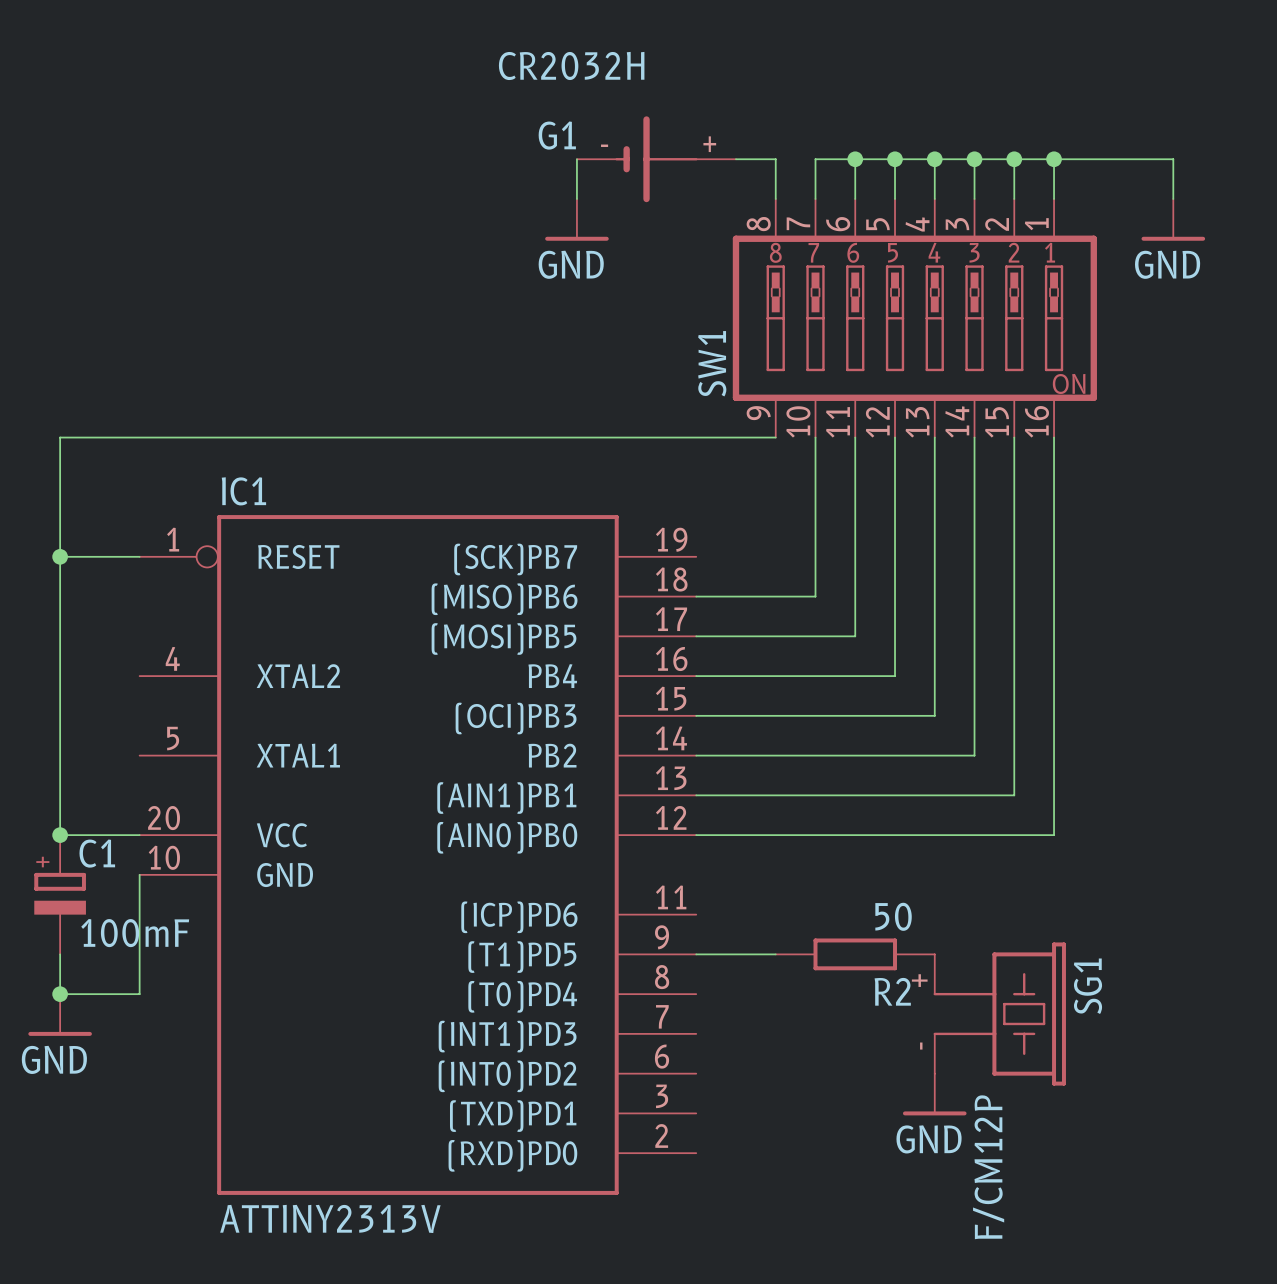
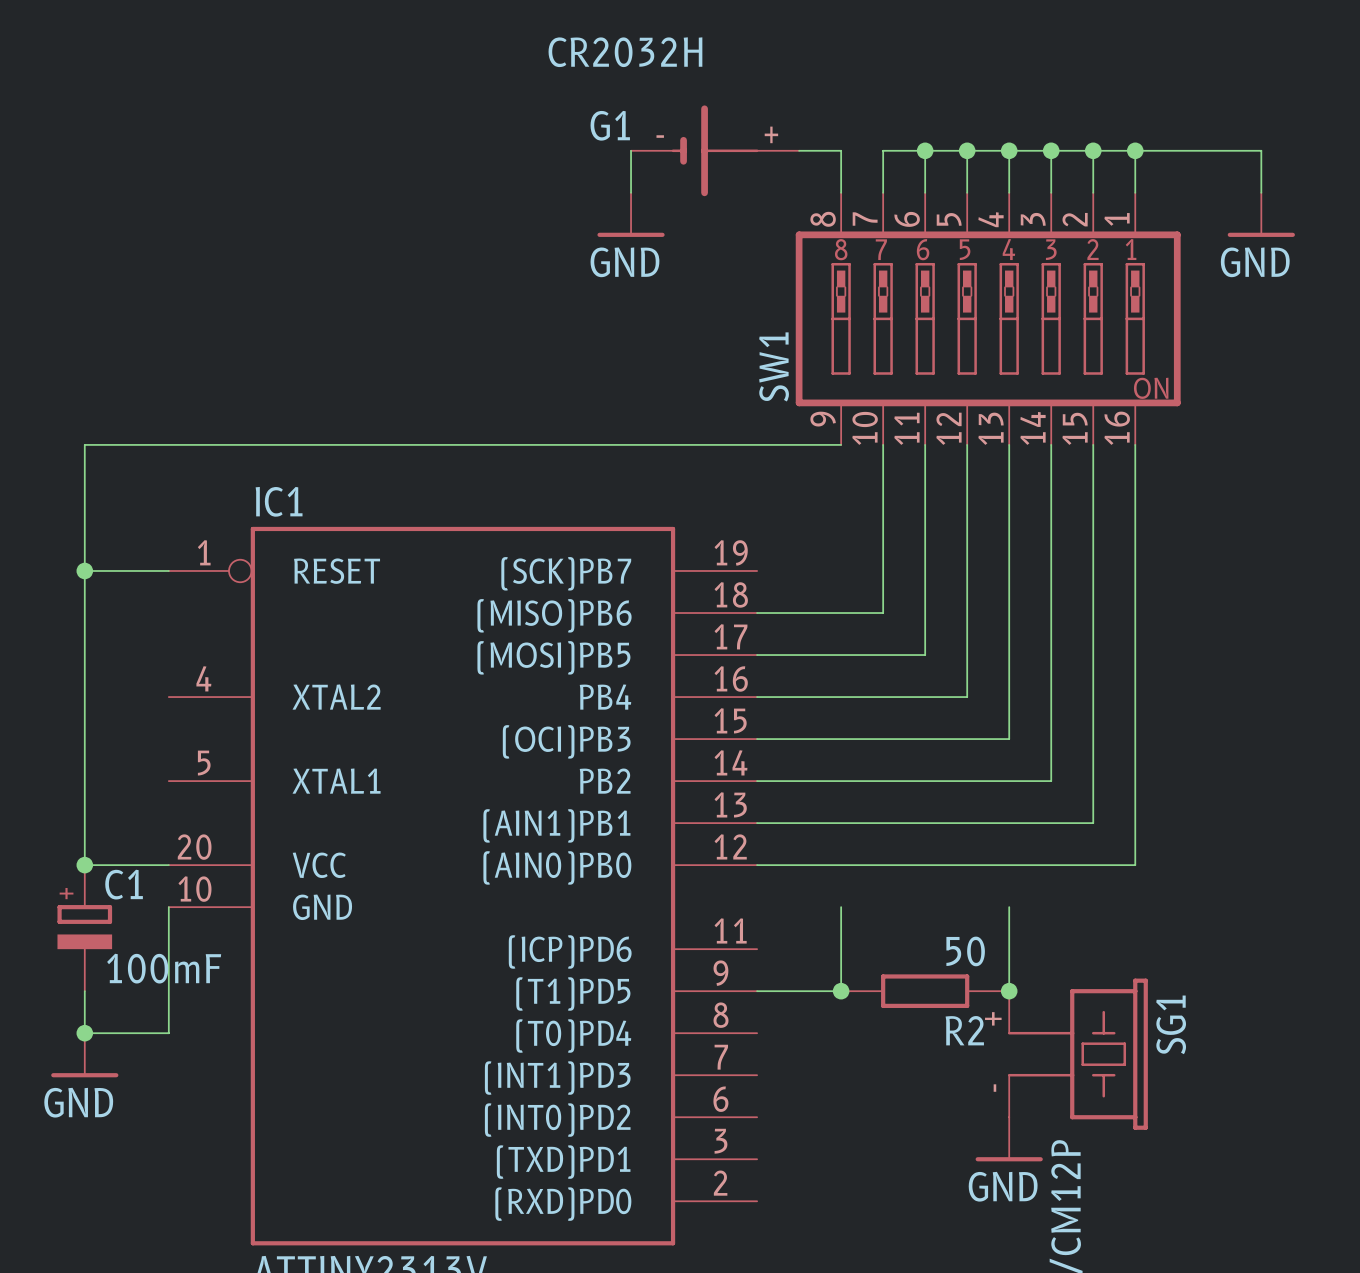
wire: none -> (841, 907) (841, 991)
wire: none -> (1009, 907) (1009, 991)
junction: none -> (841, 991)
junction: none -> (1009, 991)

